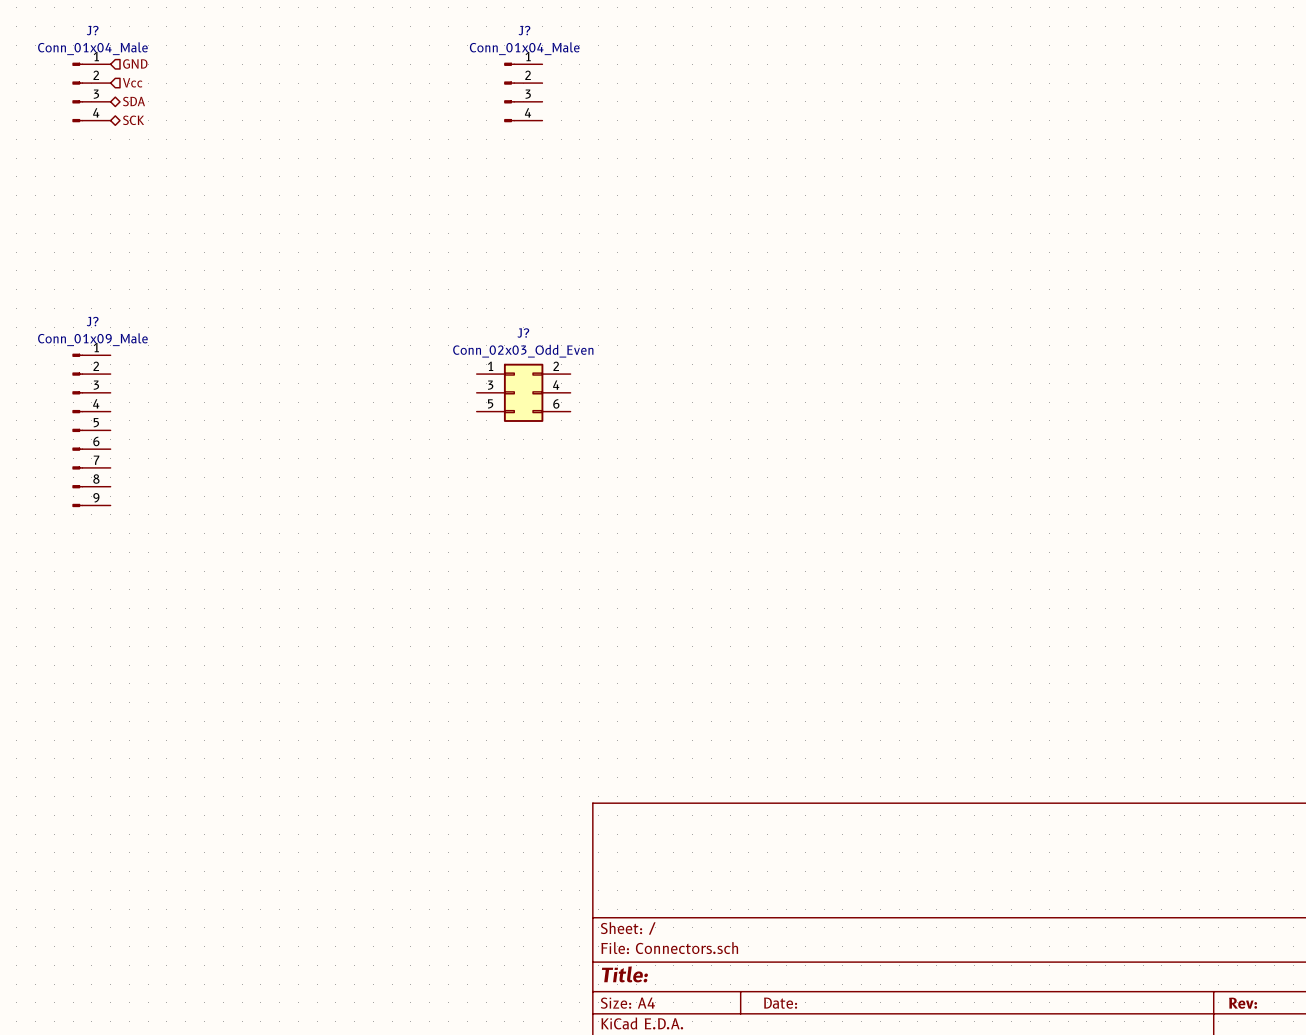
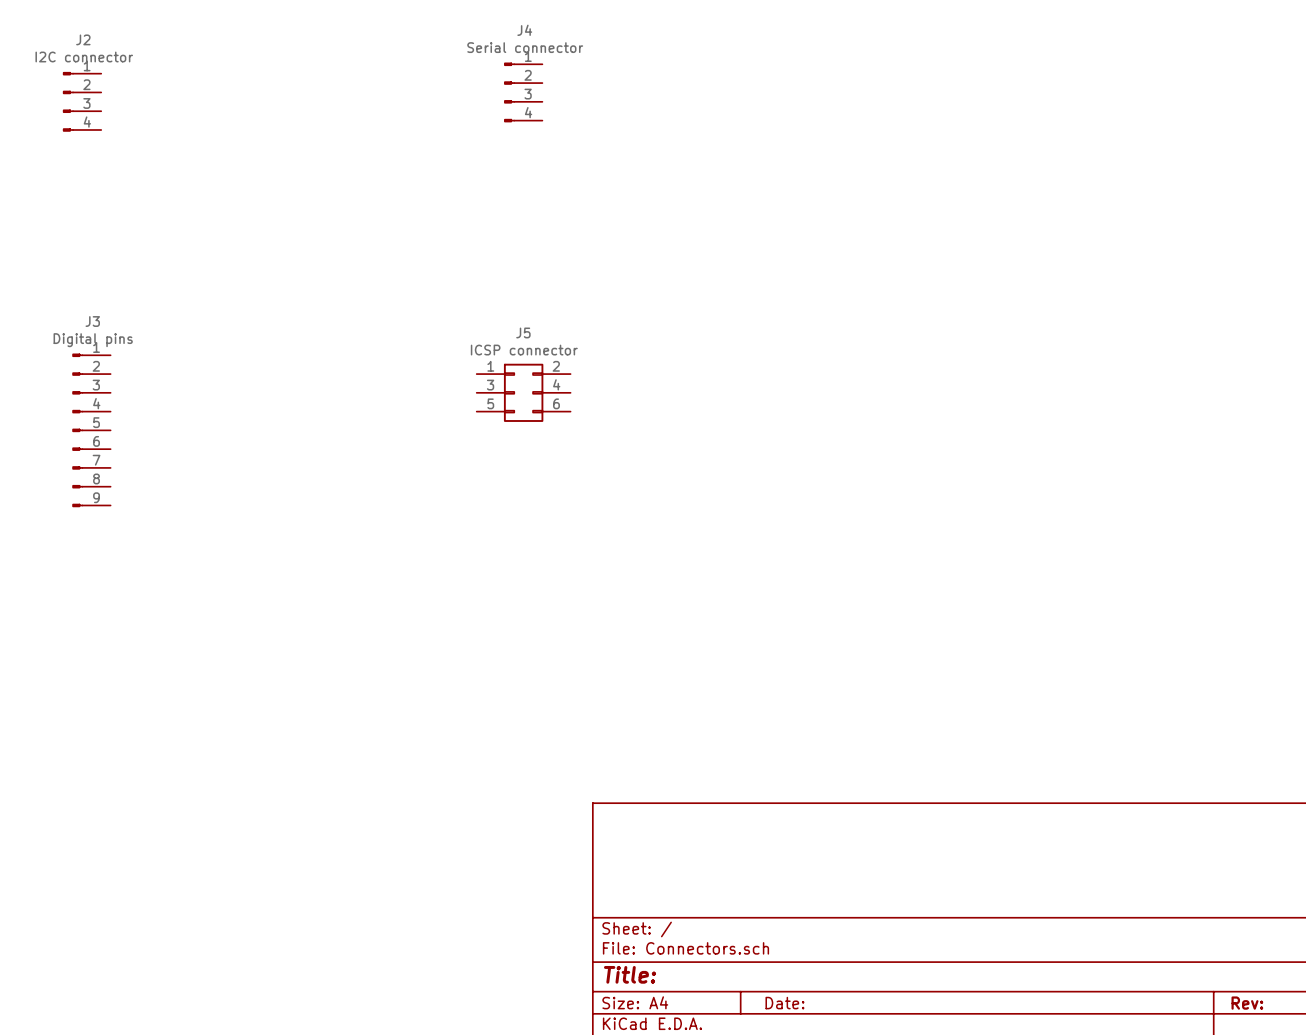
J? name: J? (524, 30) -> J4 (524, 30)
J? value: Conn_01x04_Male (524, 48) -> Serial connector (525, 47)
hierarchical label: GND (135, 63) -> none
hierarchical label: Vcc (132, 82) -> none
J?: Conn_01x04_Male (91, 92) -> none
J2: none -> I2C connector (82, 101)
hierarchical label: SDA (134, 101) -> none
hierarchical label: SCK (133, 120) -> none
J? name: J? (92, 321) -> J3 (92, 321)
J? name: J? (523, 333) -> J5 (523, 332)
J? value: Conn_01x09_Male (92, 339) -> Digital pins (93, 340)
J? value: Conn_02x03_Odd_Even (523, 351) -> ICSP connector (524, 350)

